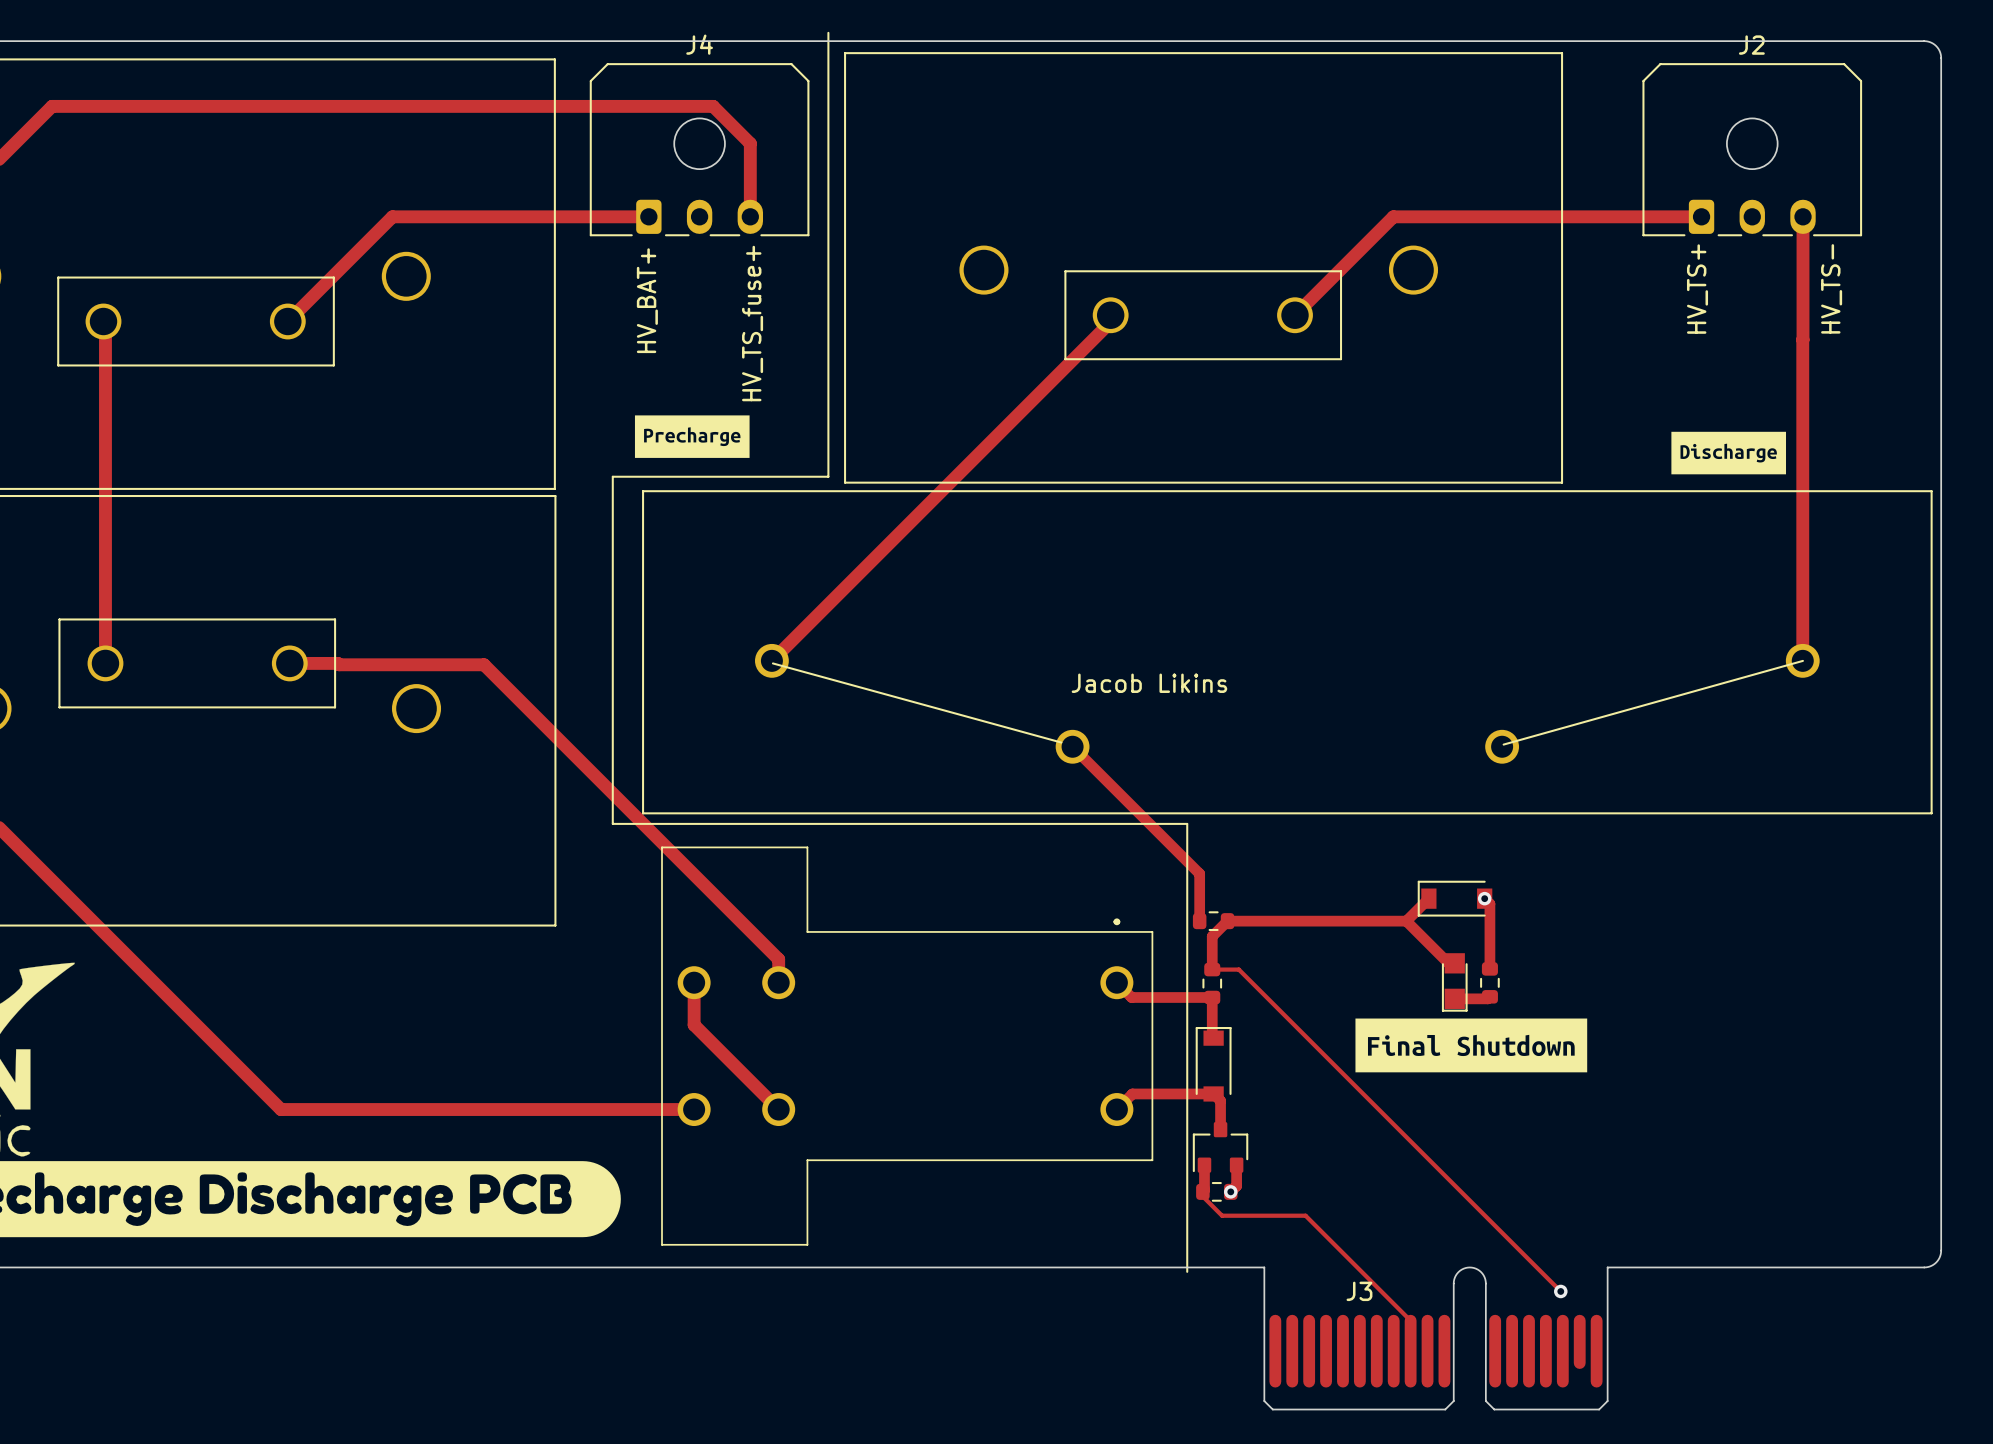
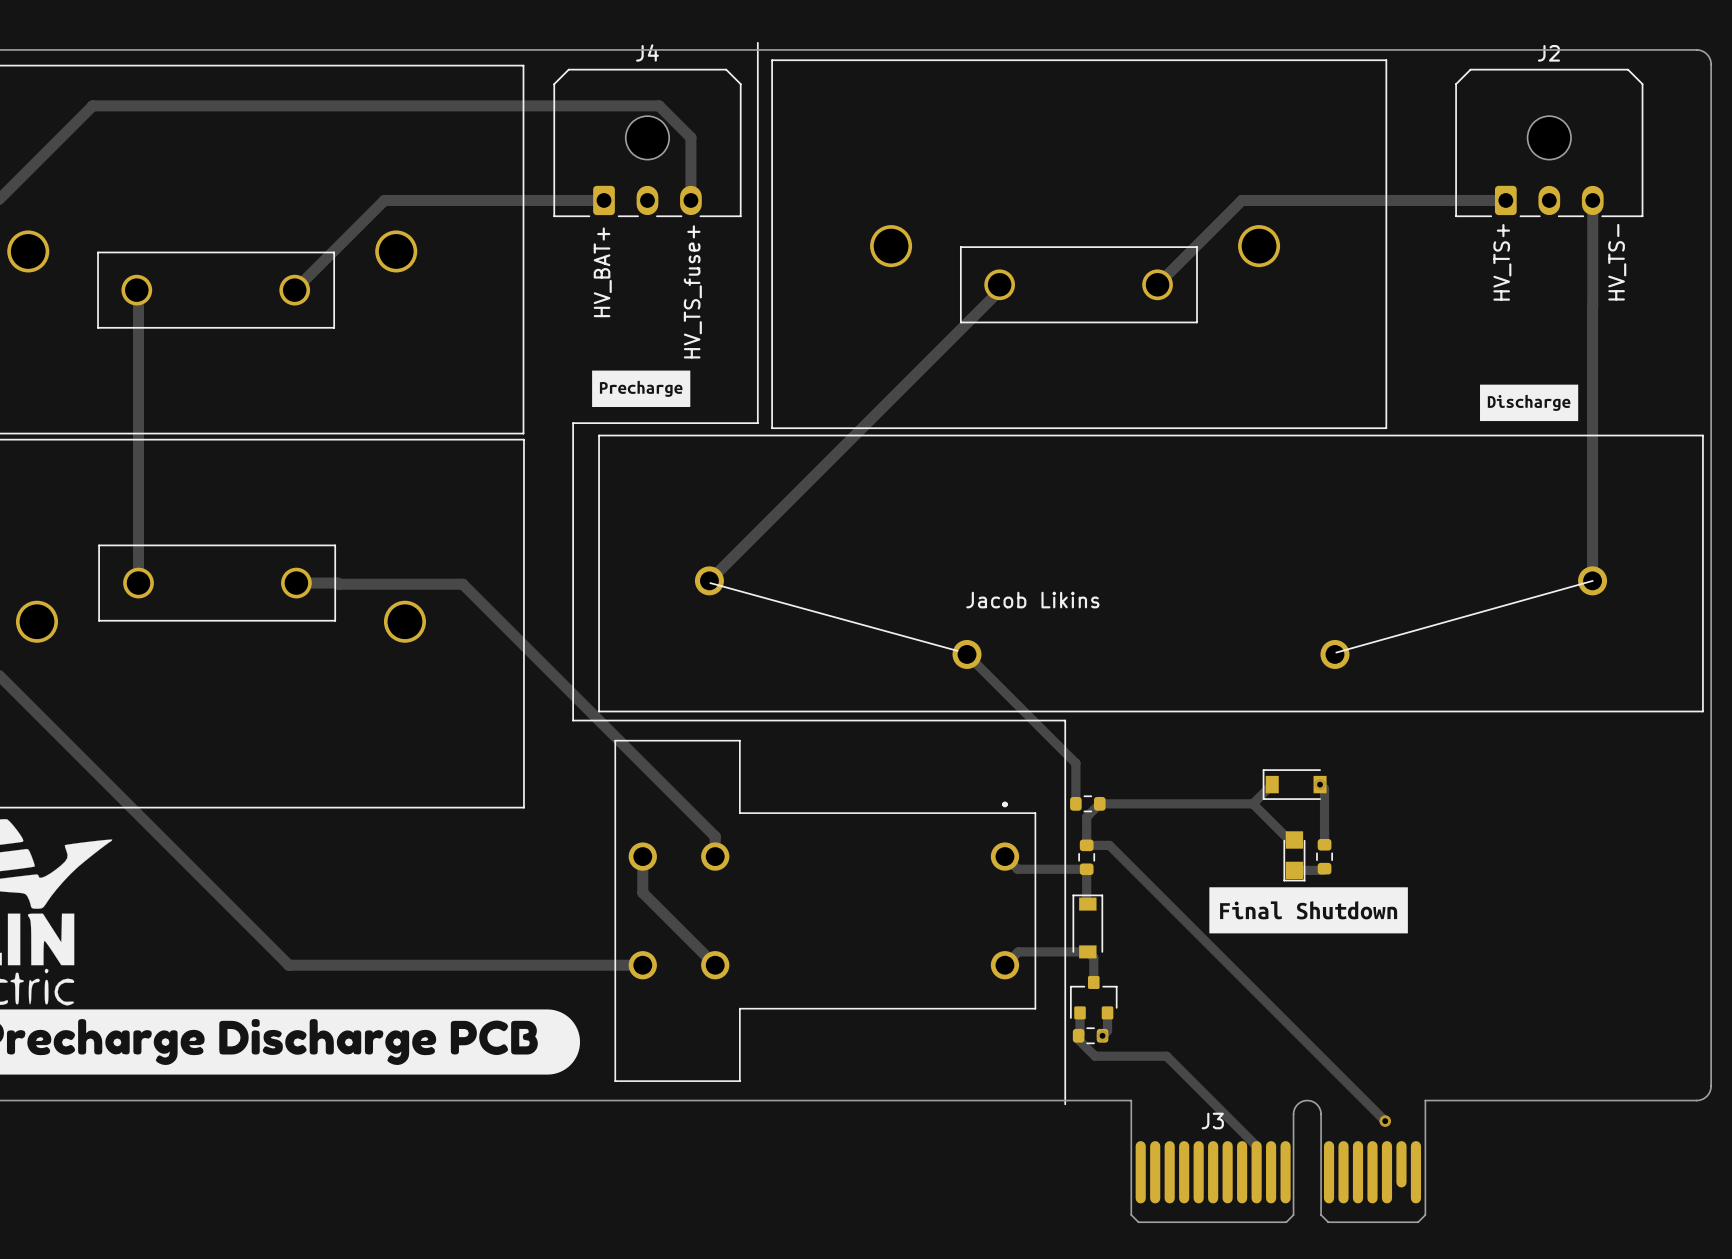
track width: thin (1212, 969) (1238, 969) (1560, 1291) -> thick (1086, 845) (1109, 845) (1385, 1121)
track width: thin (1202, 1191) (1202, 1196) (1222, 1215) (1305, 1215) (1410, 1320) (1410, 1351) -> thick (1078, 1035) (1078, 1039) (1095, 1056) (1166, 1056) (1256, 1146) (1256, 1172)

